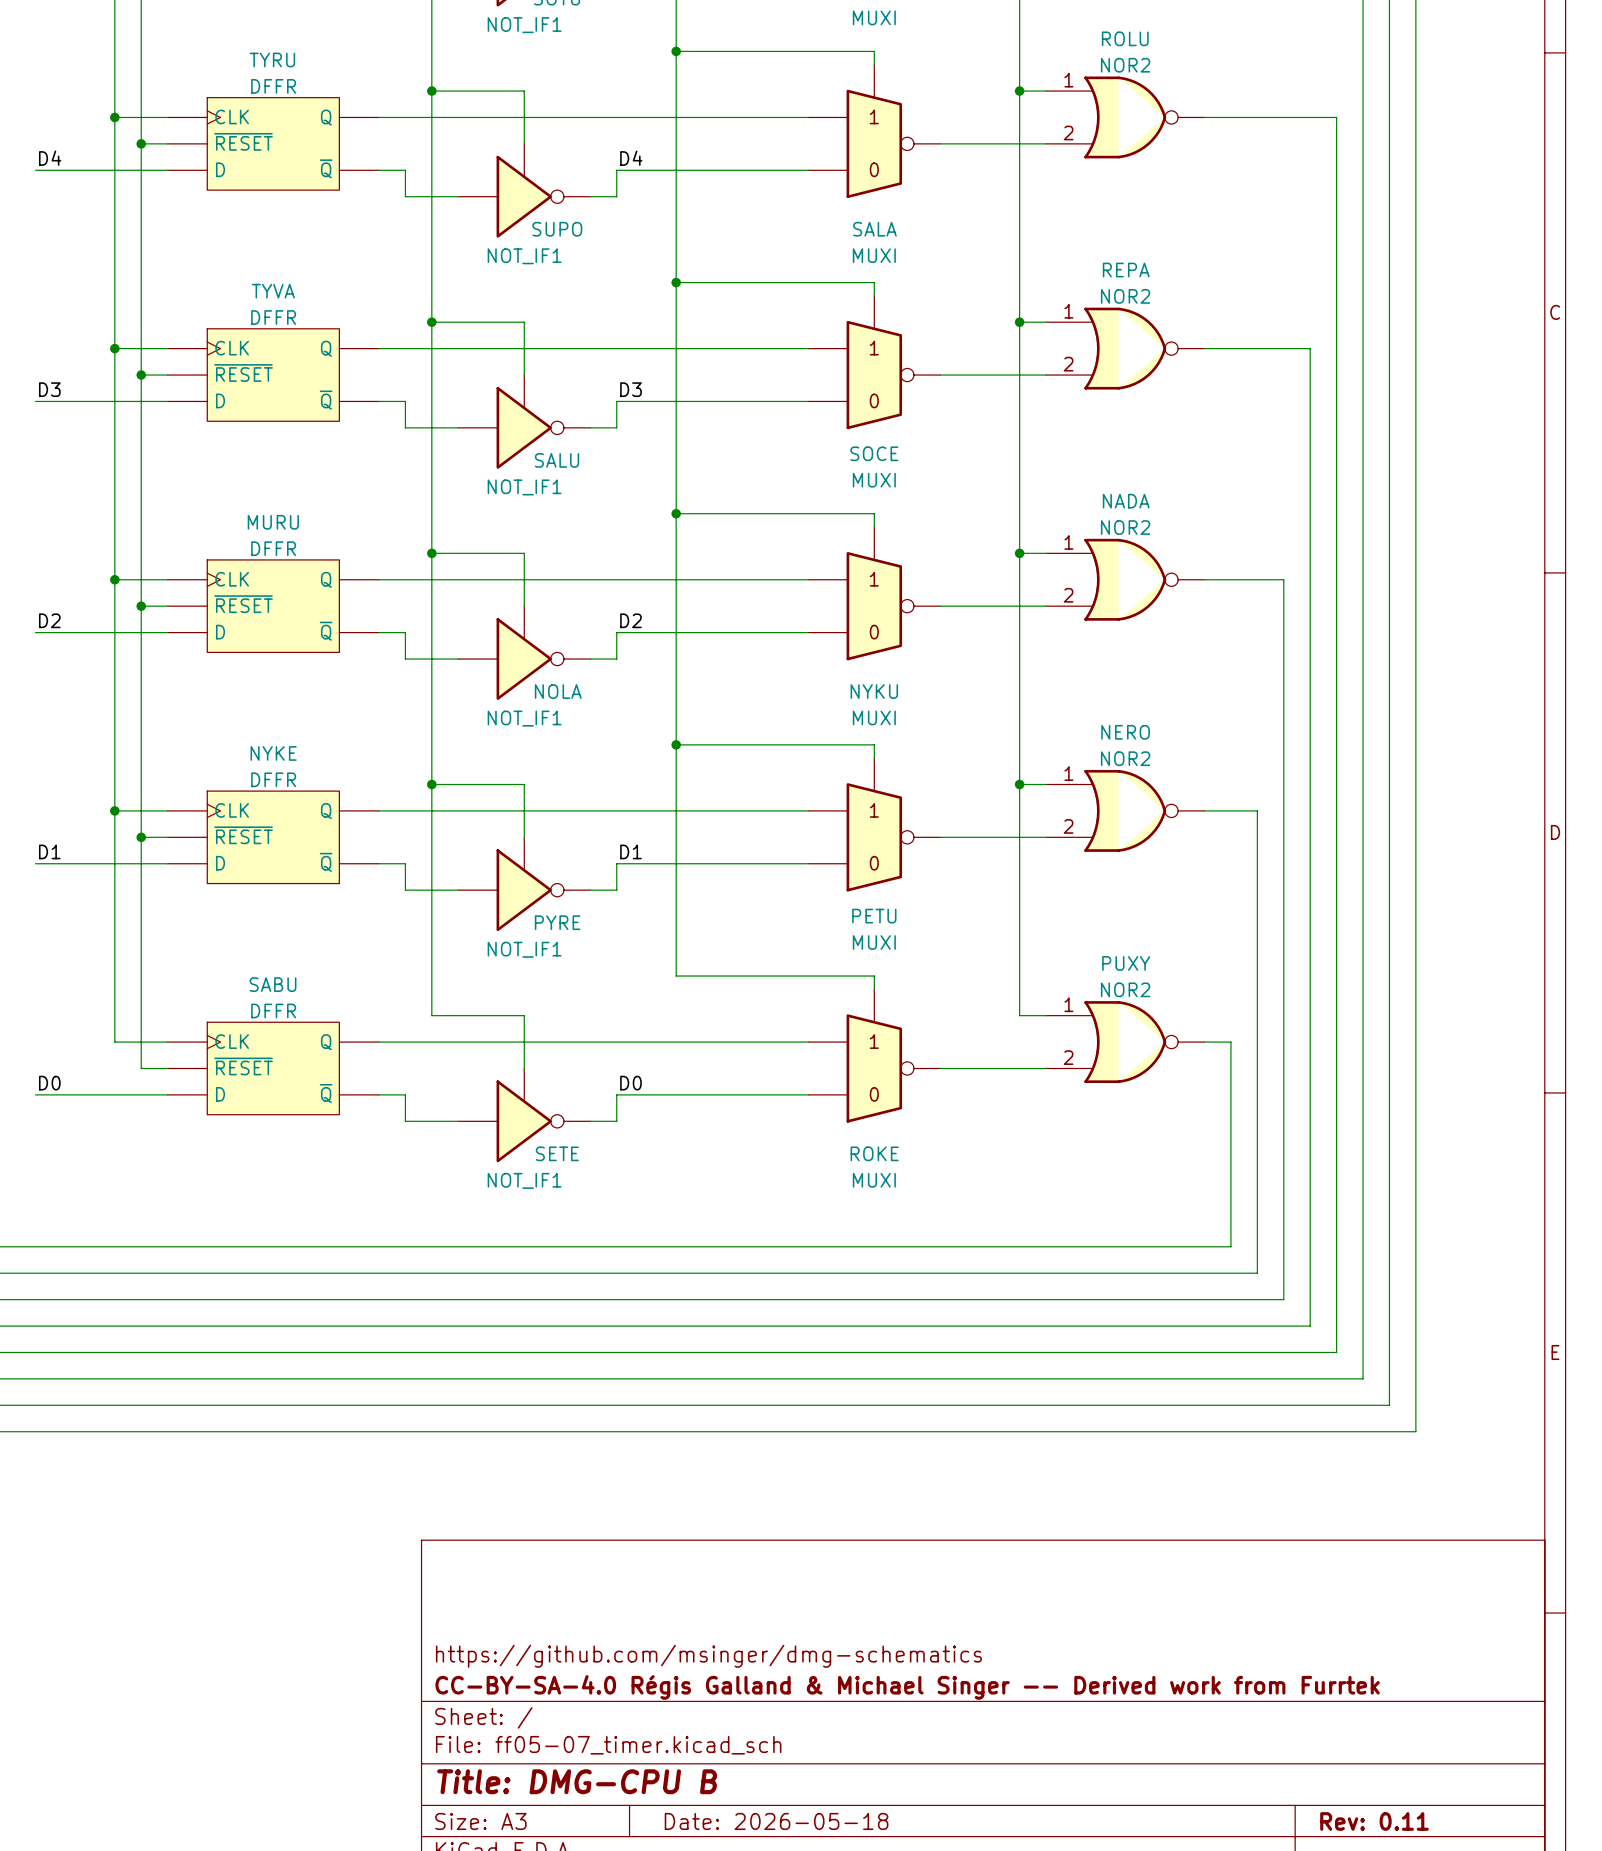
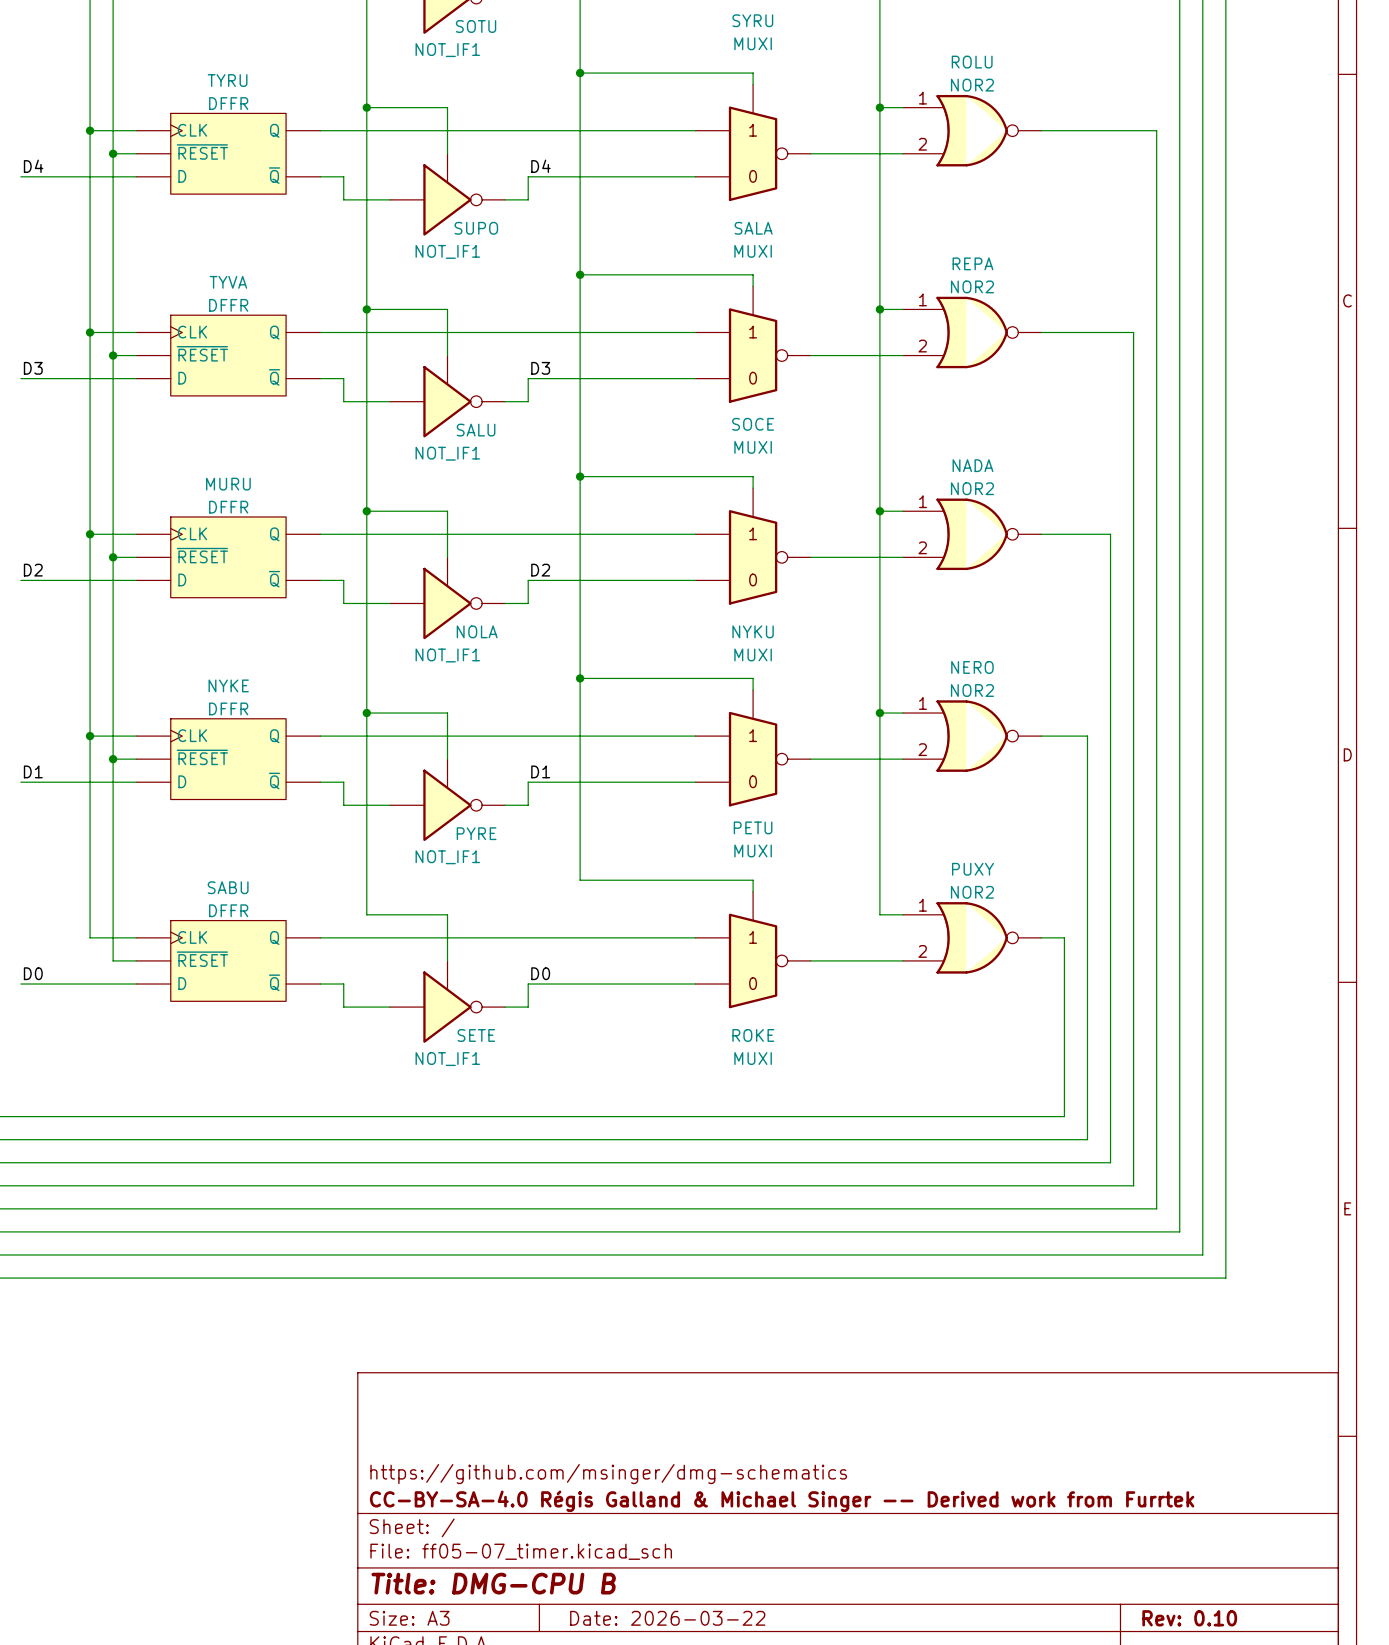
title block: Date: 2026-05-18 (776, 1821) -> Date: 2026-03-22 (667, 1618)
title block: Rev: 0.11 (1374, 1821) -> Rev: 0.10 (1189, 1618)

